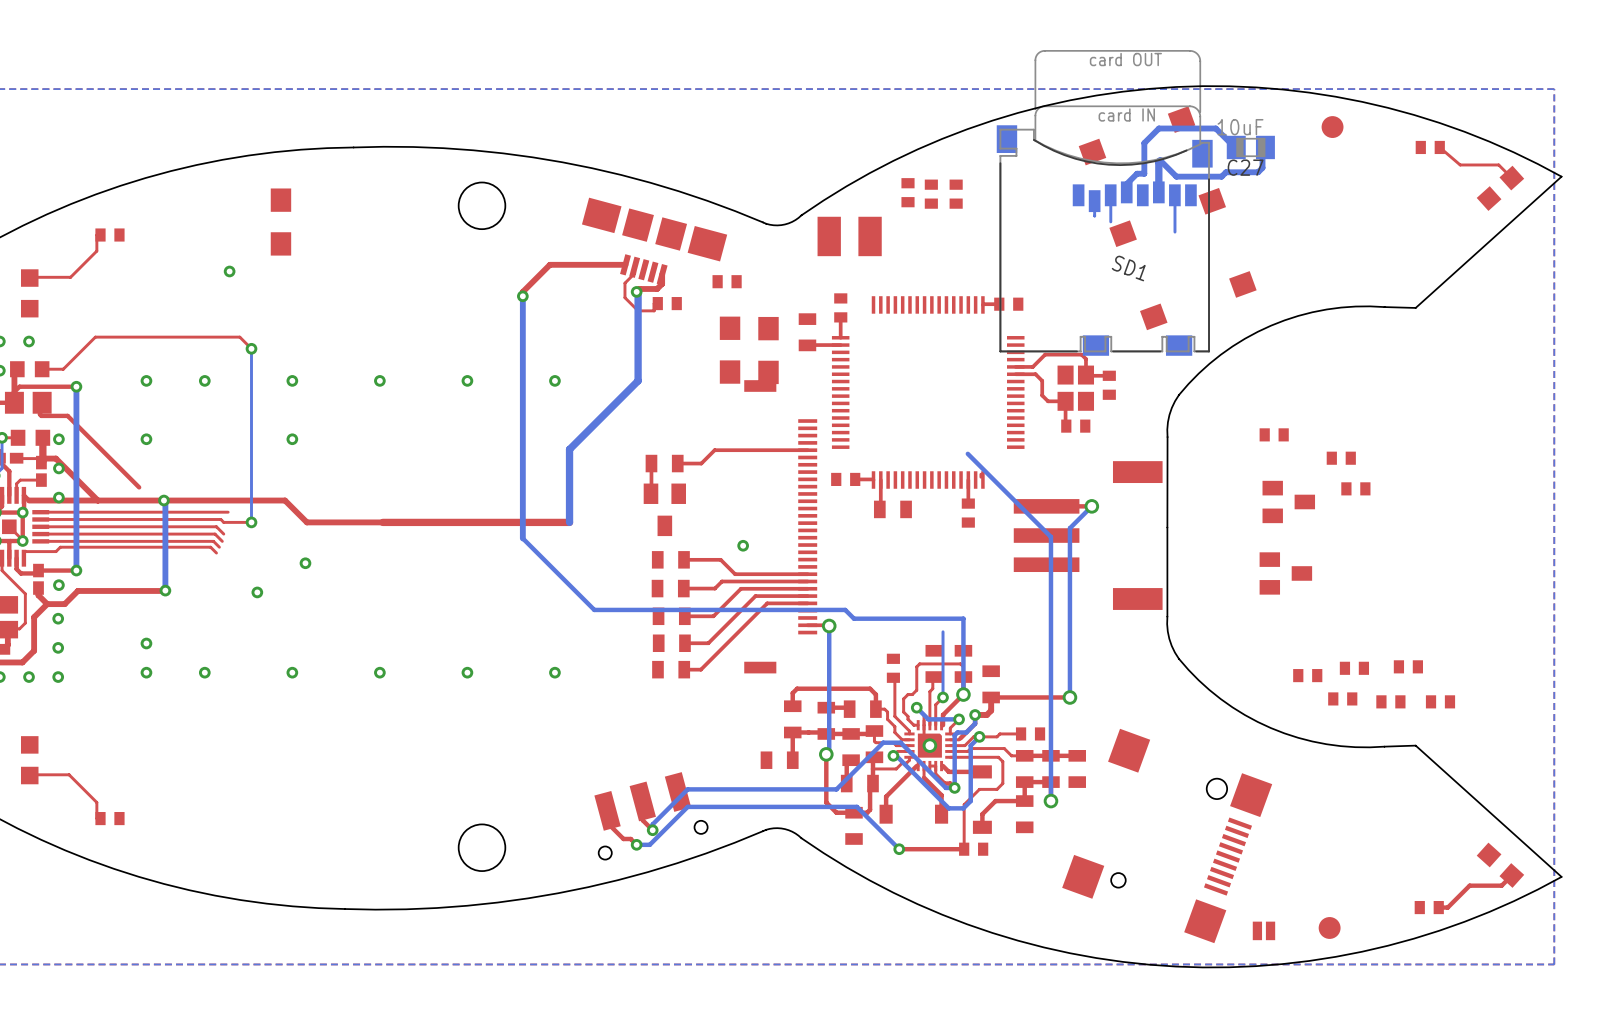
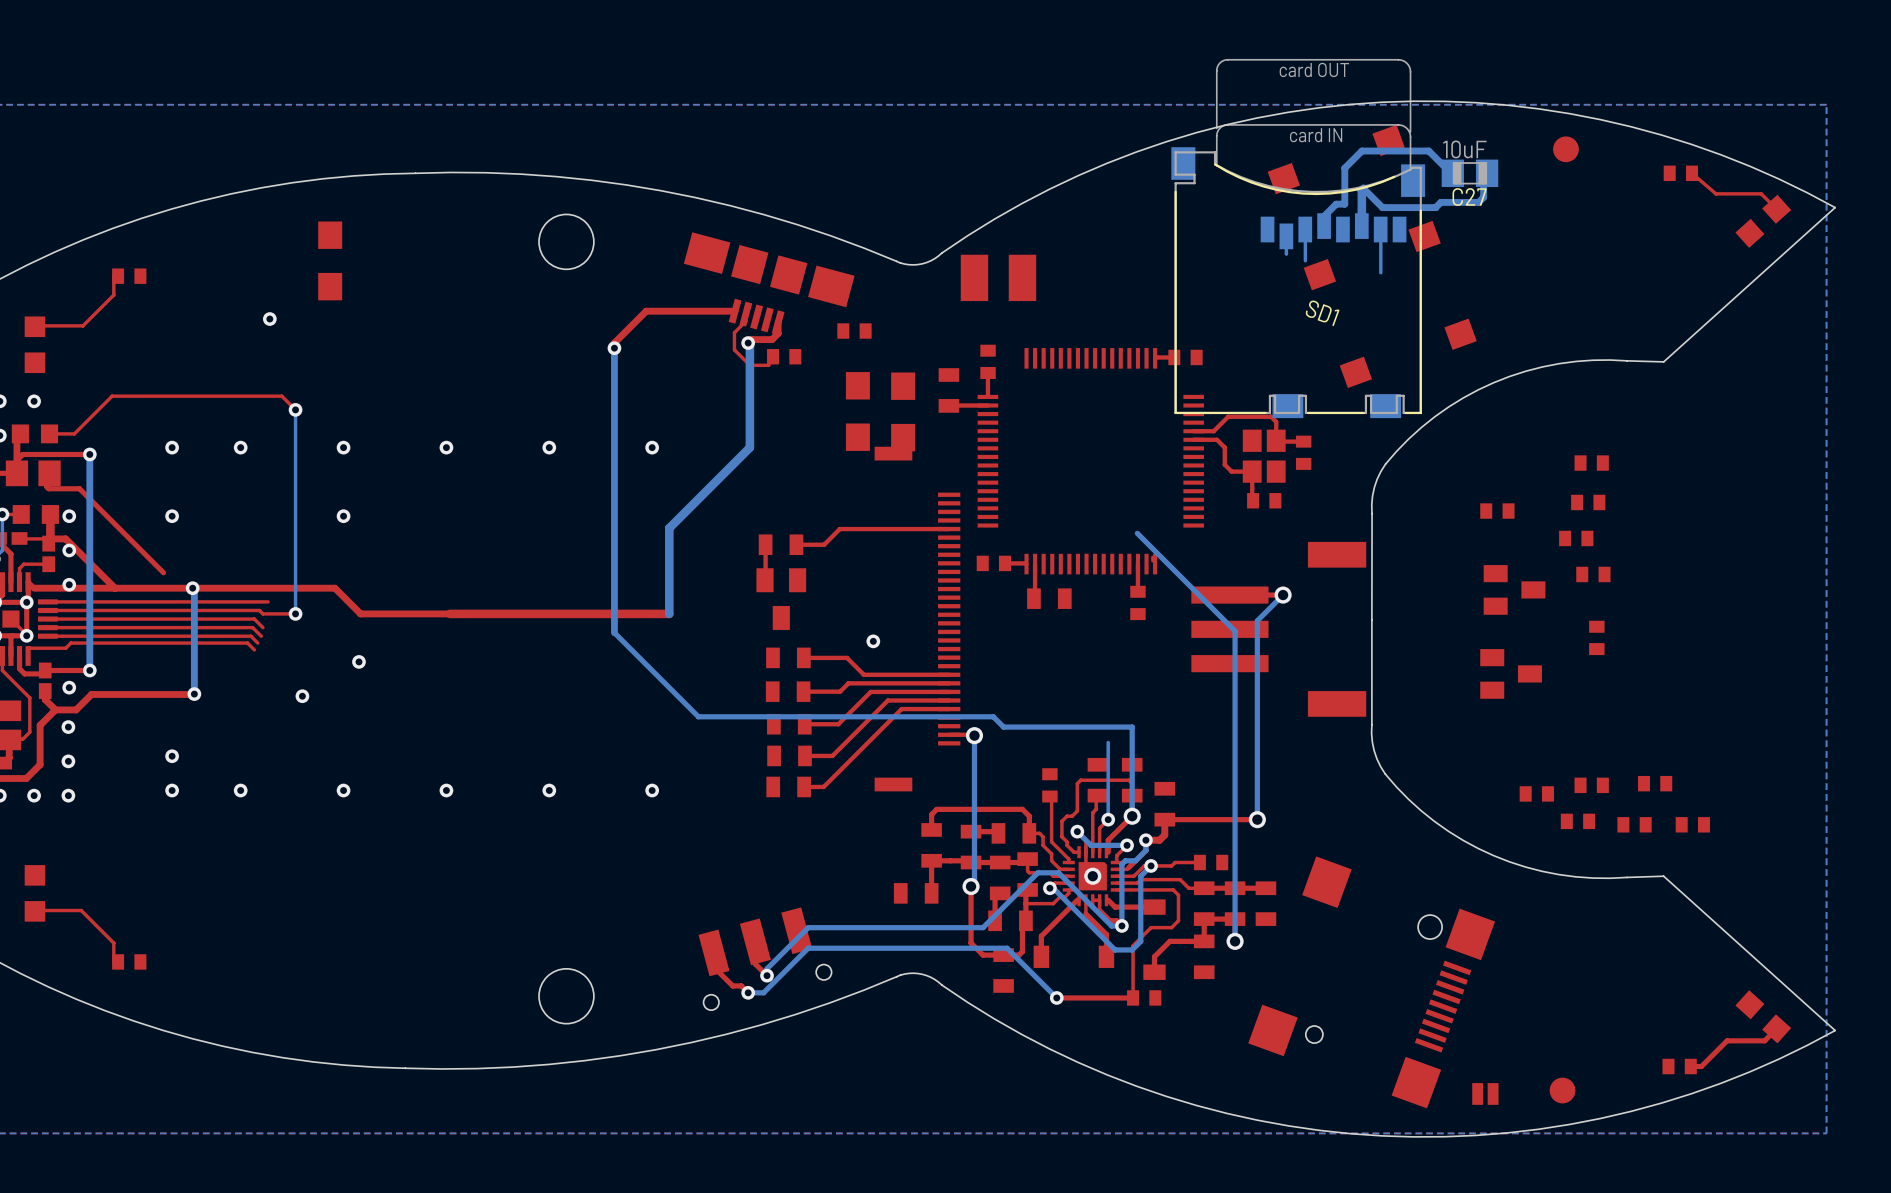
part: (908, 192) -> none
part: (931, 194) -> none
part: (956, 194) -> none
part: none -> (1591, 463)
part: none -> (1588, 502)
part: none -> (1596, 637)

